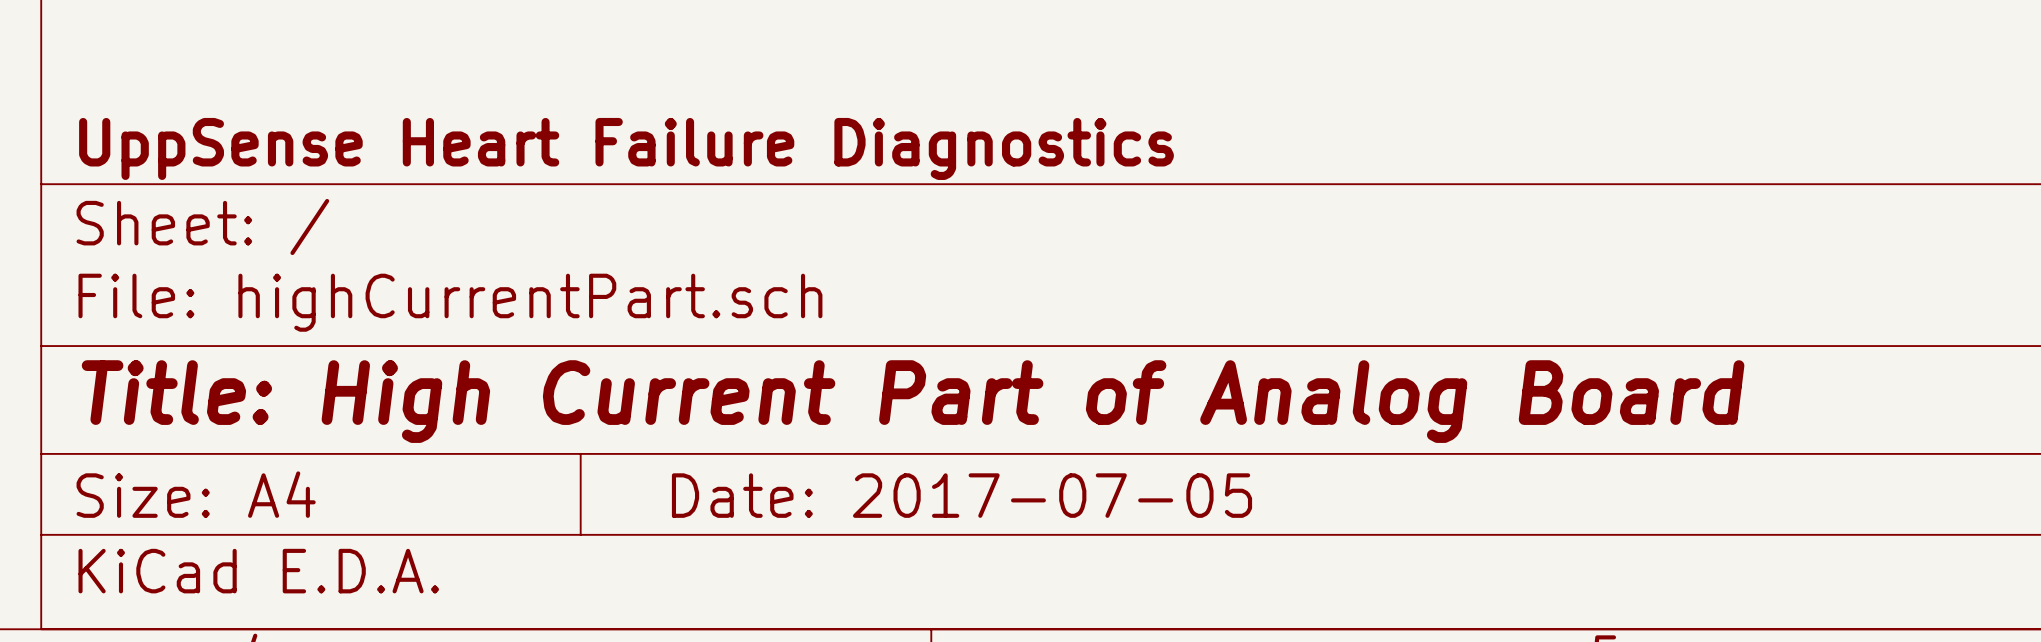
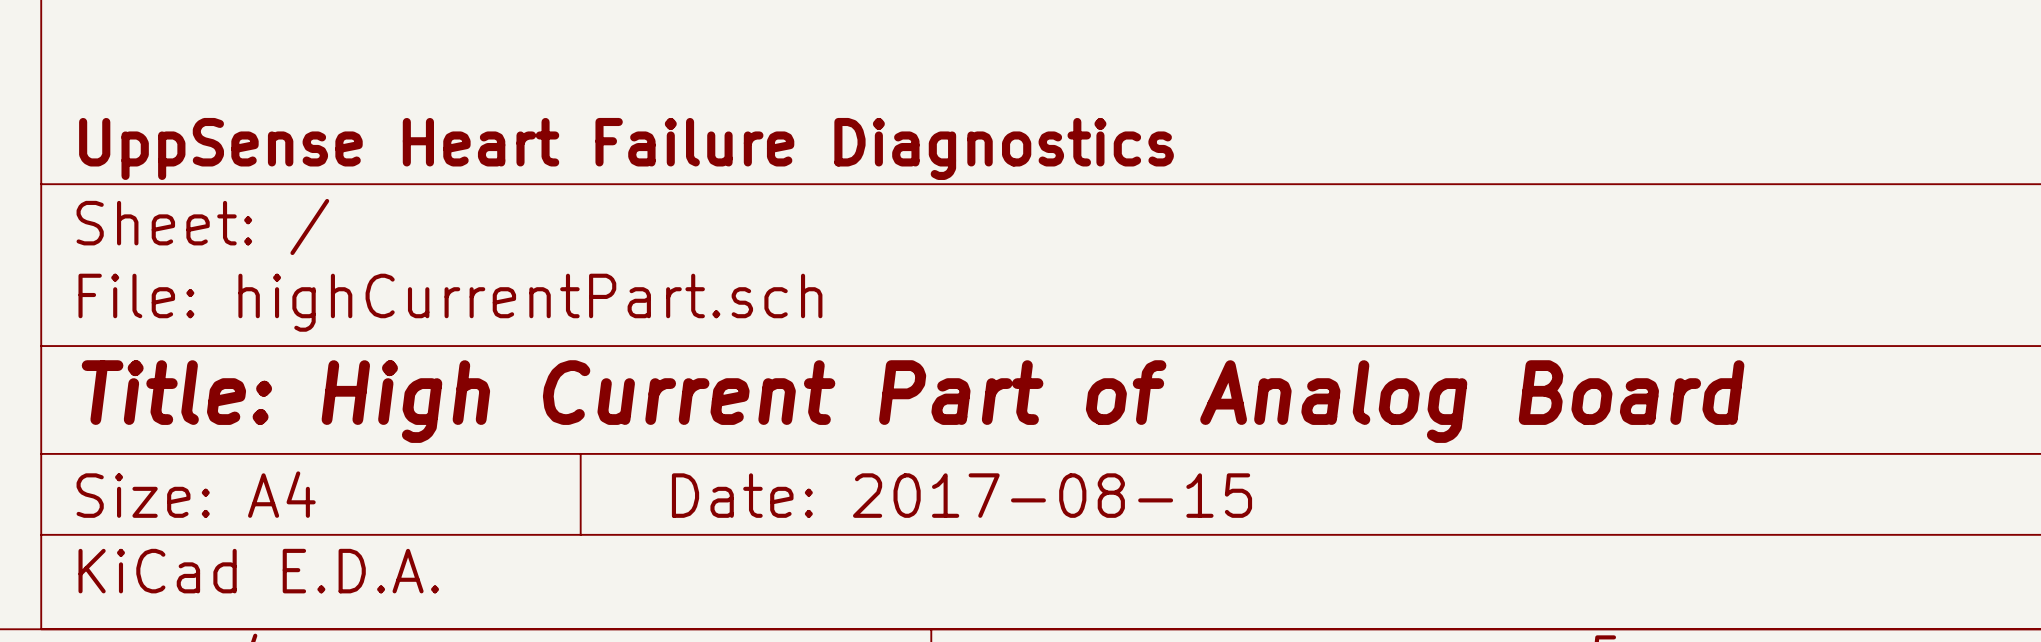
title block: Date: 2017-07-05 (961, 495) -> Date: 2017-08-15 (961, 495)

